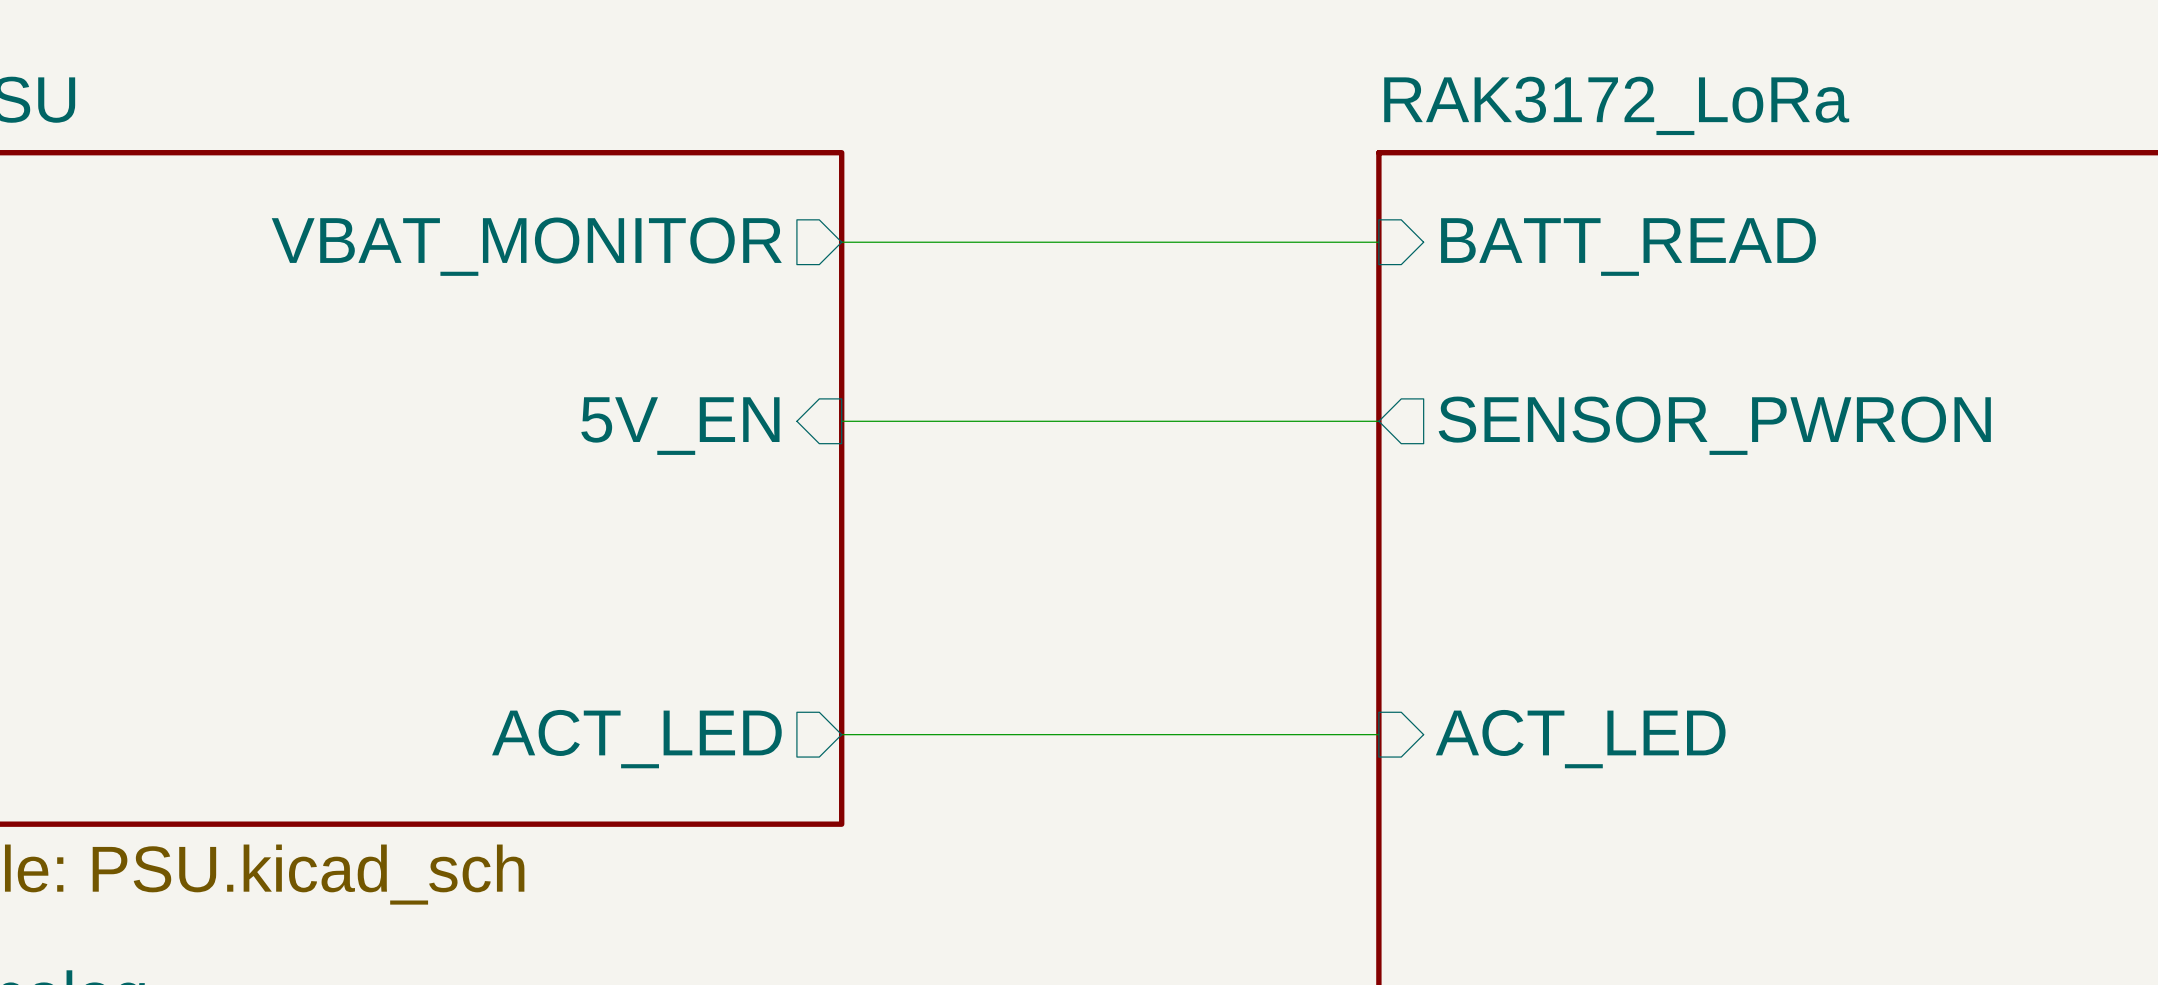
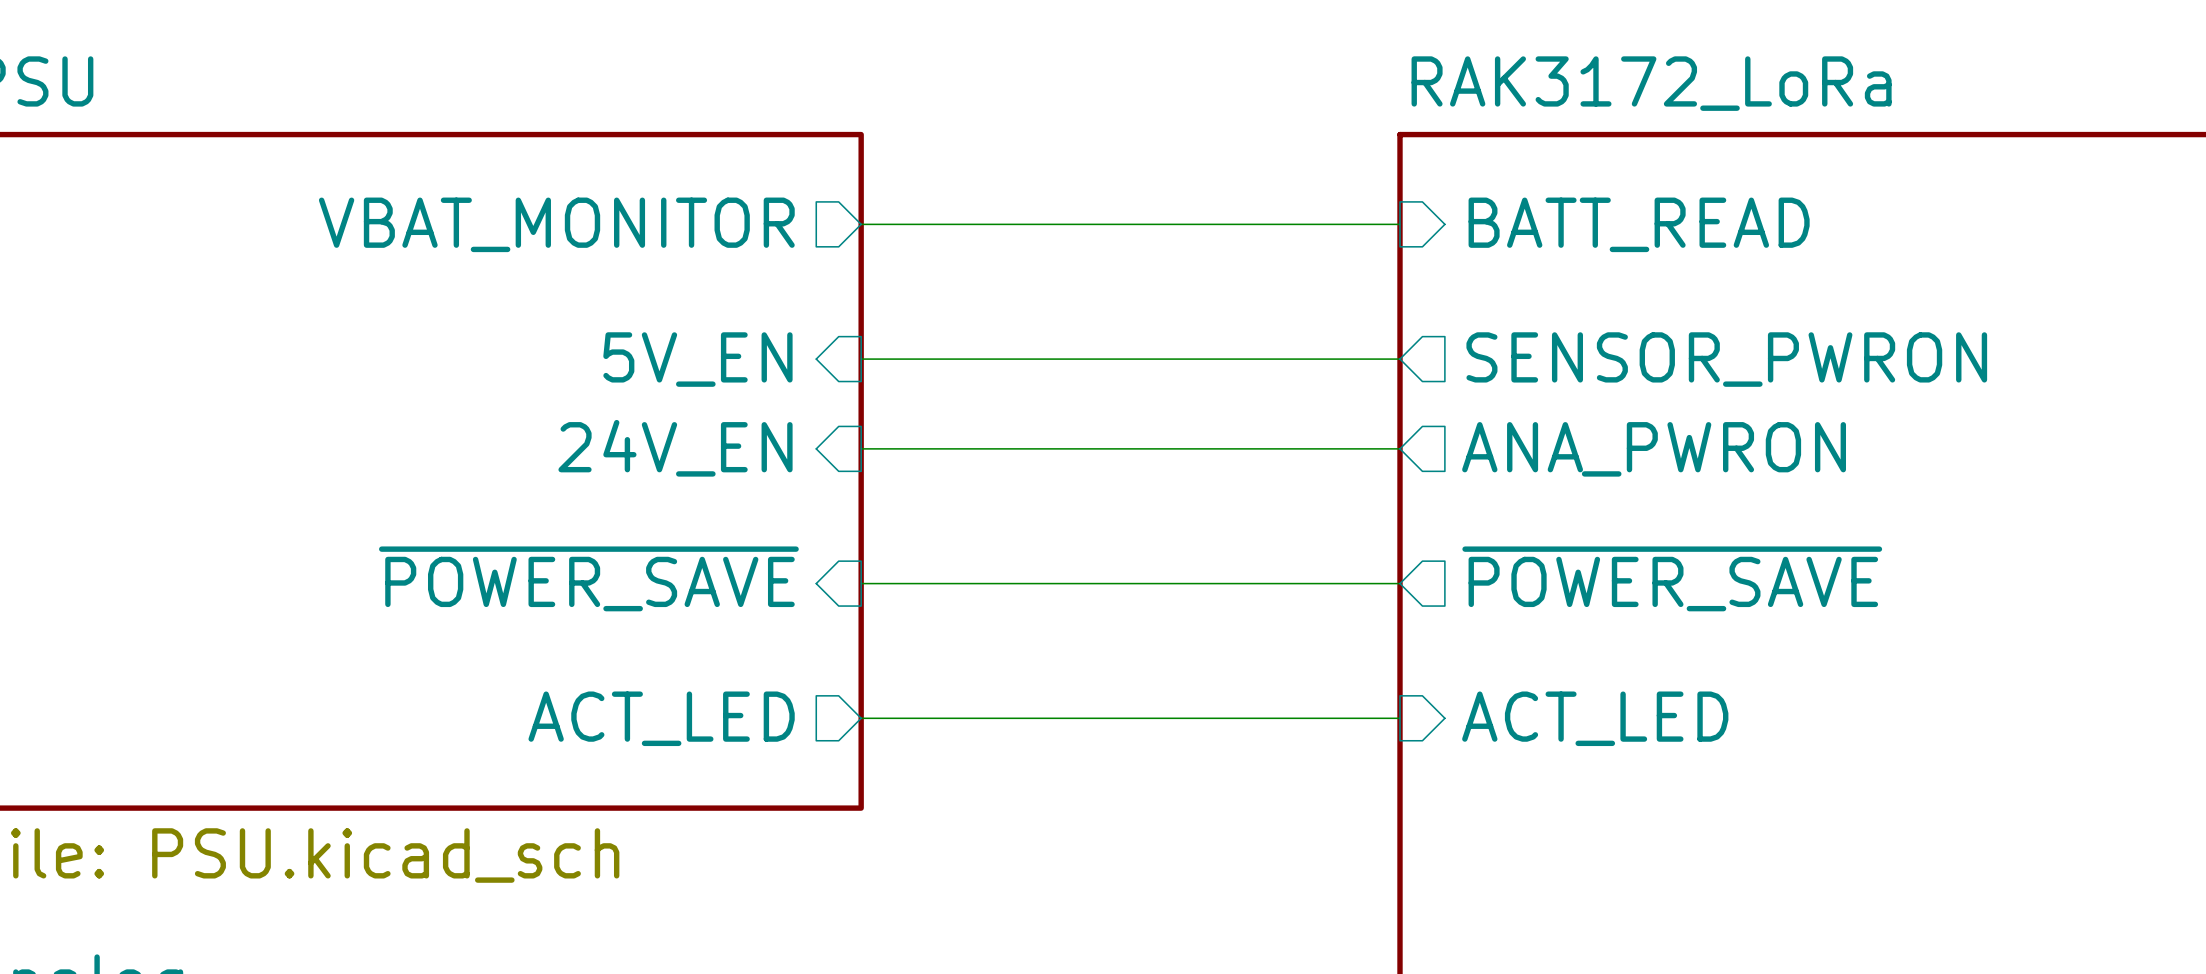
wire: (841, 421) (1378, 421) -> (861, 359) (1399, 359)
sheet pin position: SENSOR_PWRON (1714, 425) -> SENSOR_PWRON (1726, 359)
sheet pin position: 5V_EN (680, 426) -> 5V_EN (697, 359)
wire: none -> (861, 448) (1399, 448)
sheet pin: none -> 24V_EN (675, 448)
sheet pin: none -> ANA_PWRON (1654, 449)
sheet pin: none -> ~{POWER_SAVE} (588, 578)
wire: none -> (861, 583) (1399, 583)
sheet pin: none -> ~{POWER_SAVE} (1672, 578)

